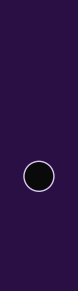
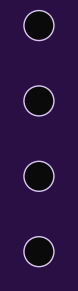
part: none -> (38, 25)
part: none -> (38, 100)
part: none -> (38, 251)

